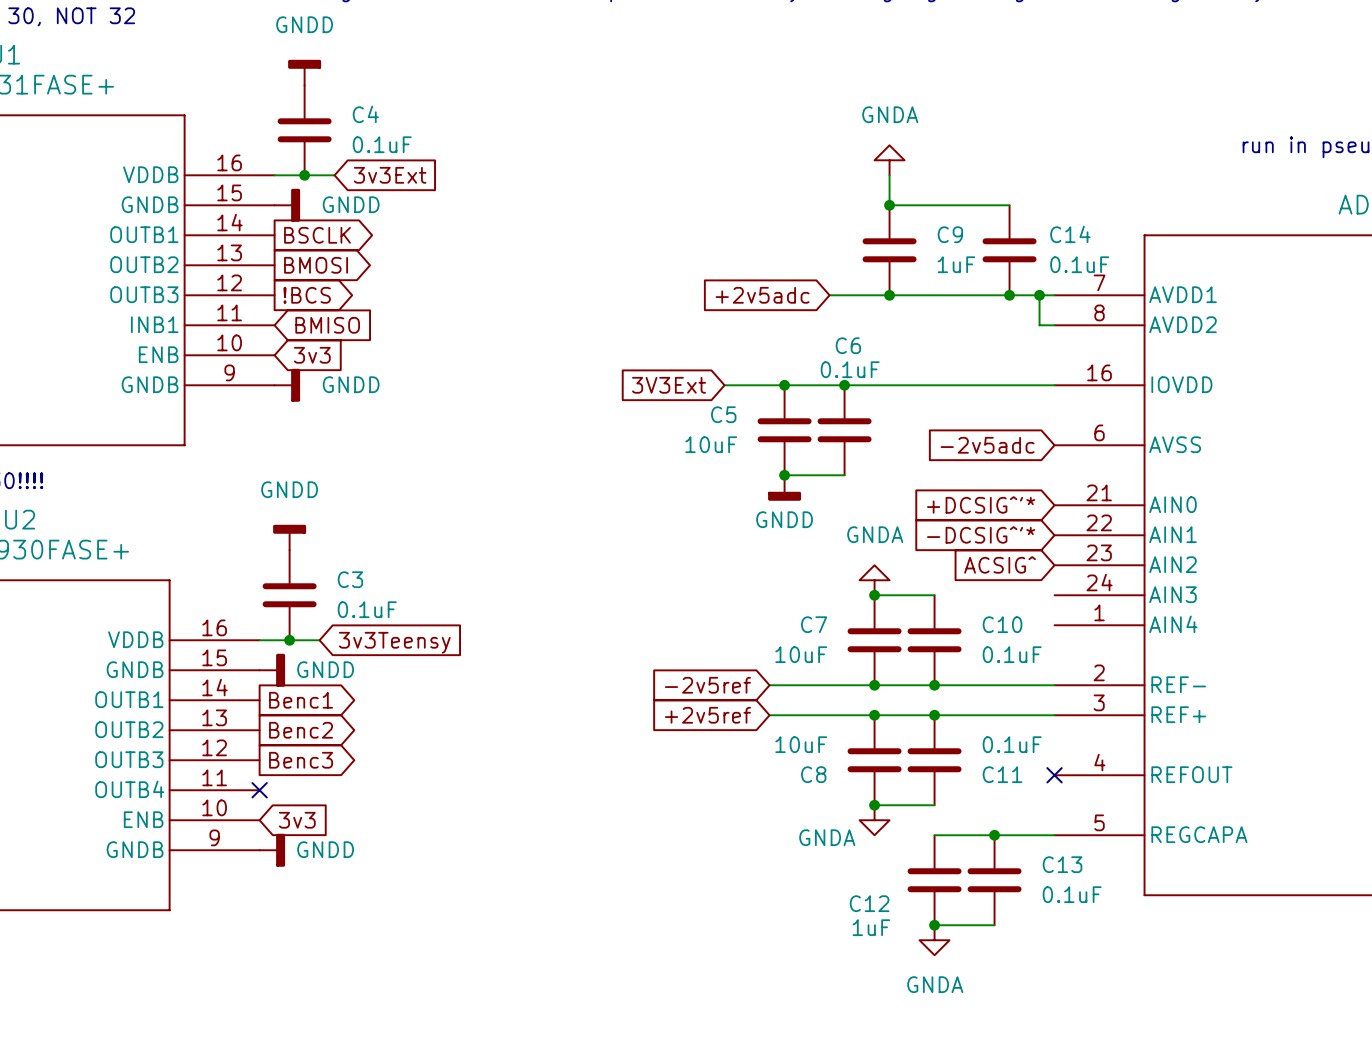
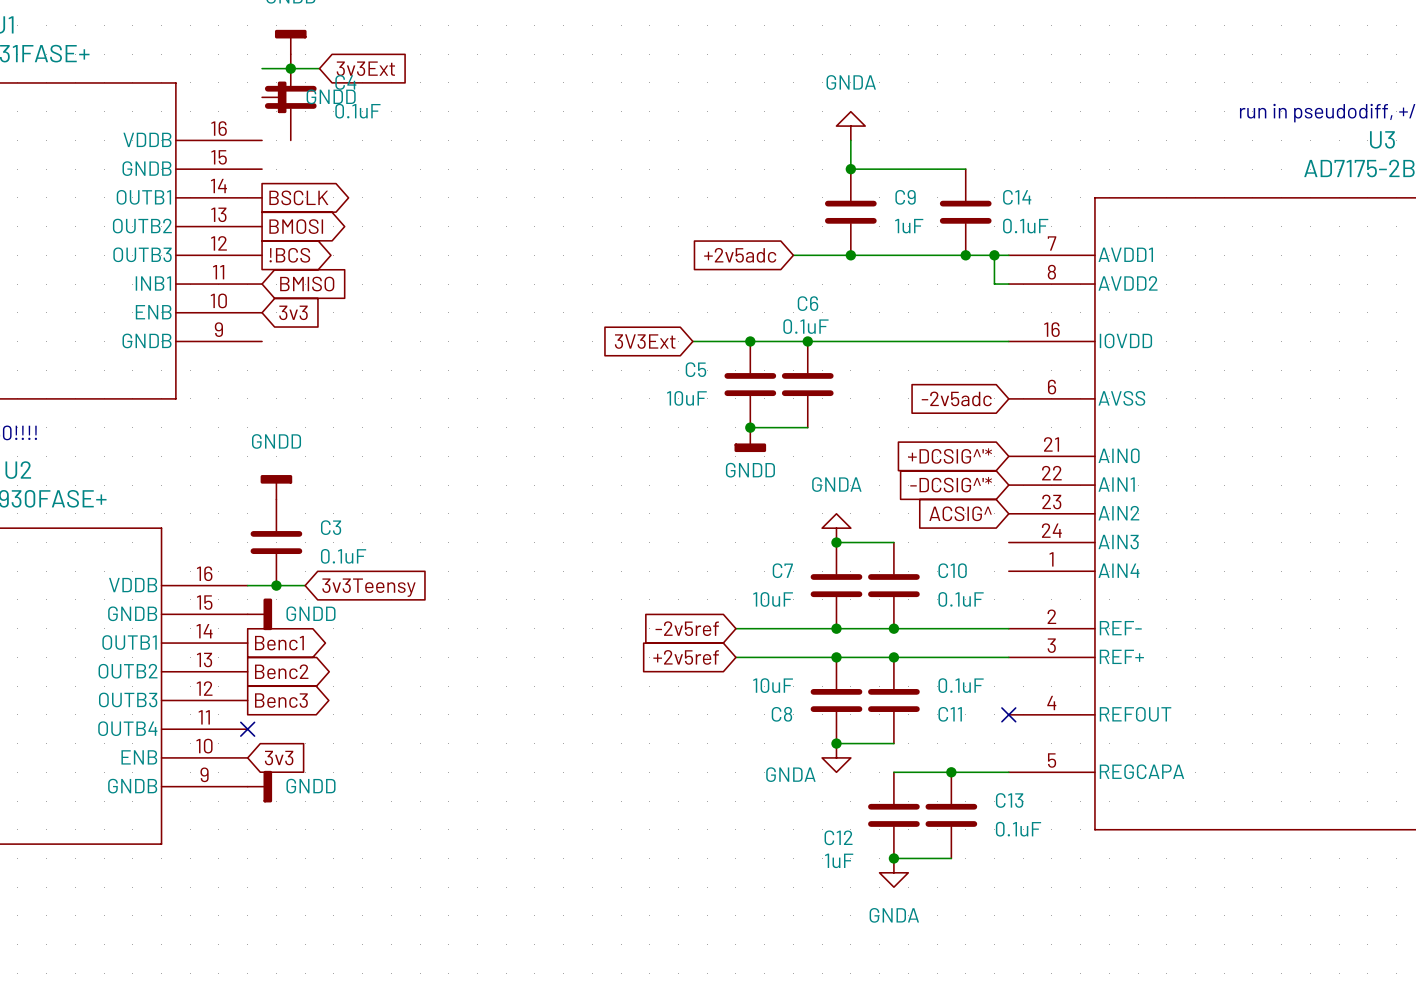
junction: none -> (290, 68)
wire: (274, 175) (334, 175) -> (262, 68) (319, 68)
junction: (304, 175) -> none
global label position: 3v3Ext (390, 175) -> 3v3Ext (365, 68)
power symbol position: GNDD (287, 205) -> GNDD (274, 97)
power symbol: GNDD (287, 385) -> none

